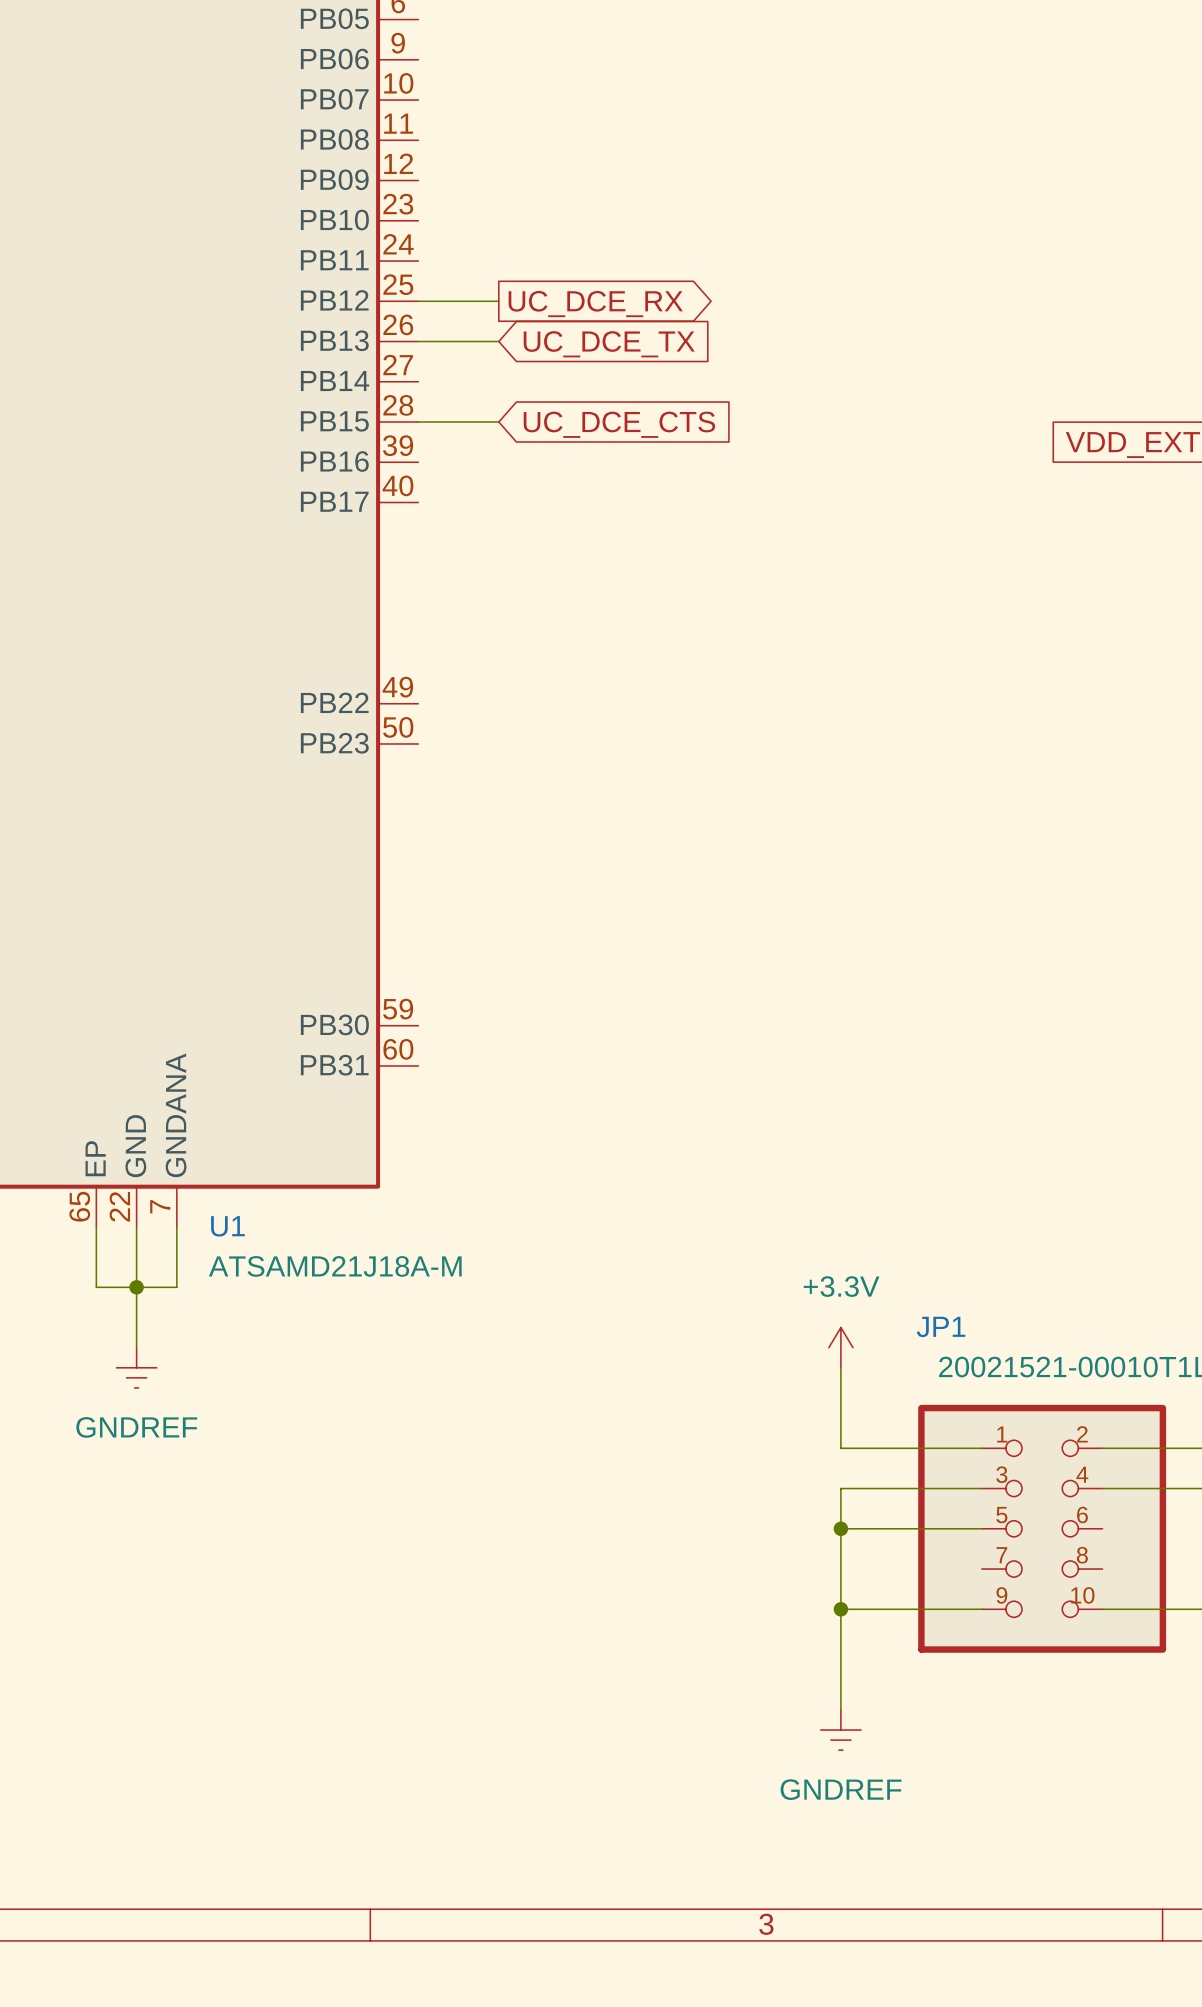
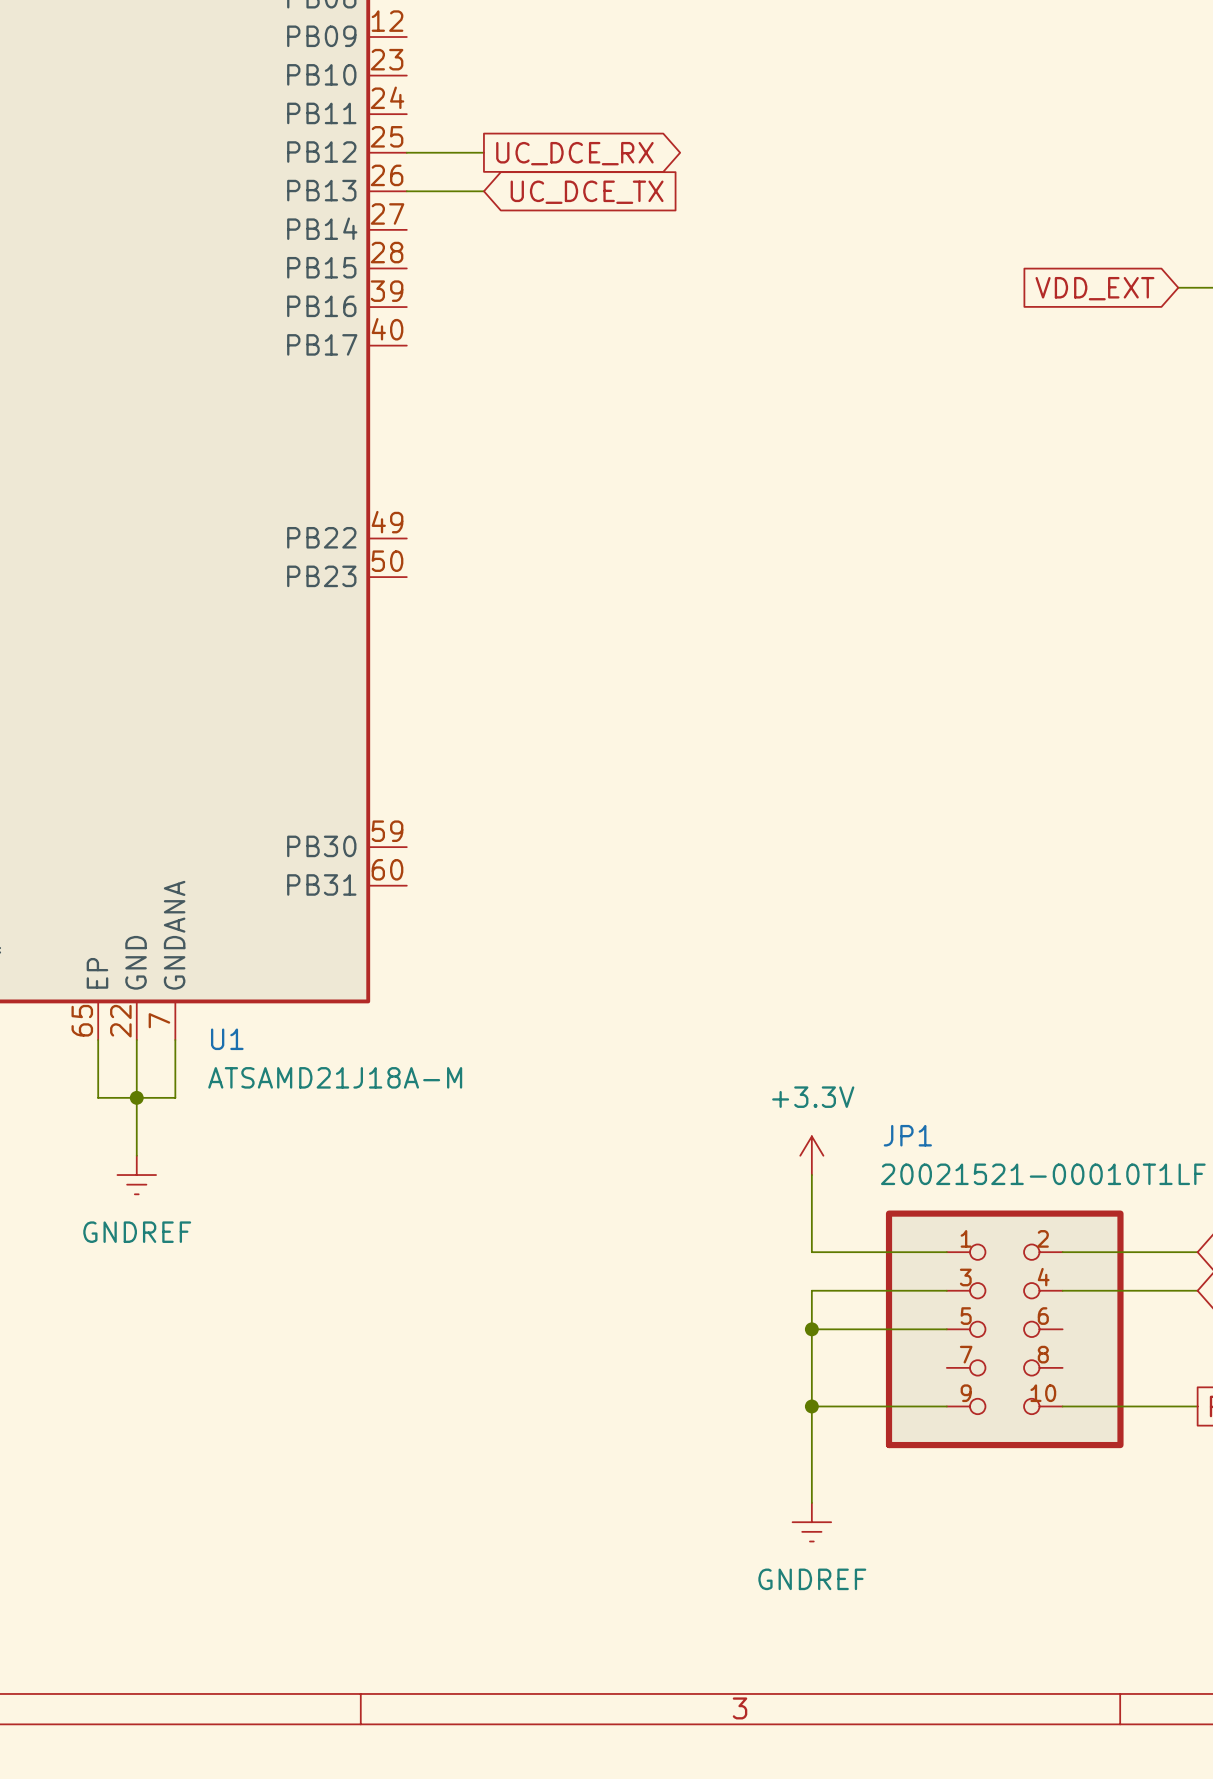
wire: (418, 422) (498, 422) -> none
global label: UC_DCE_CTS (619, 424) -> none

